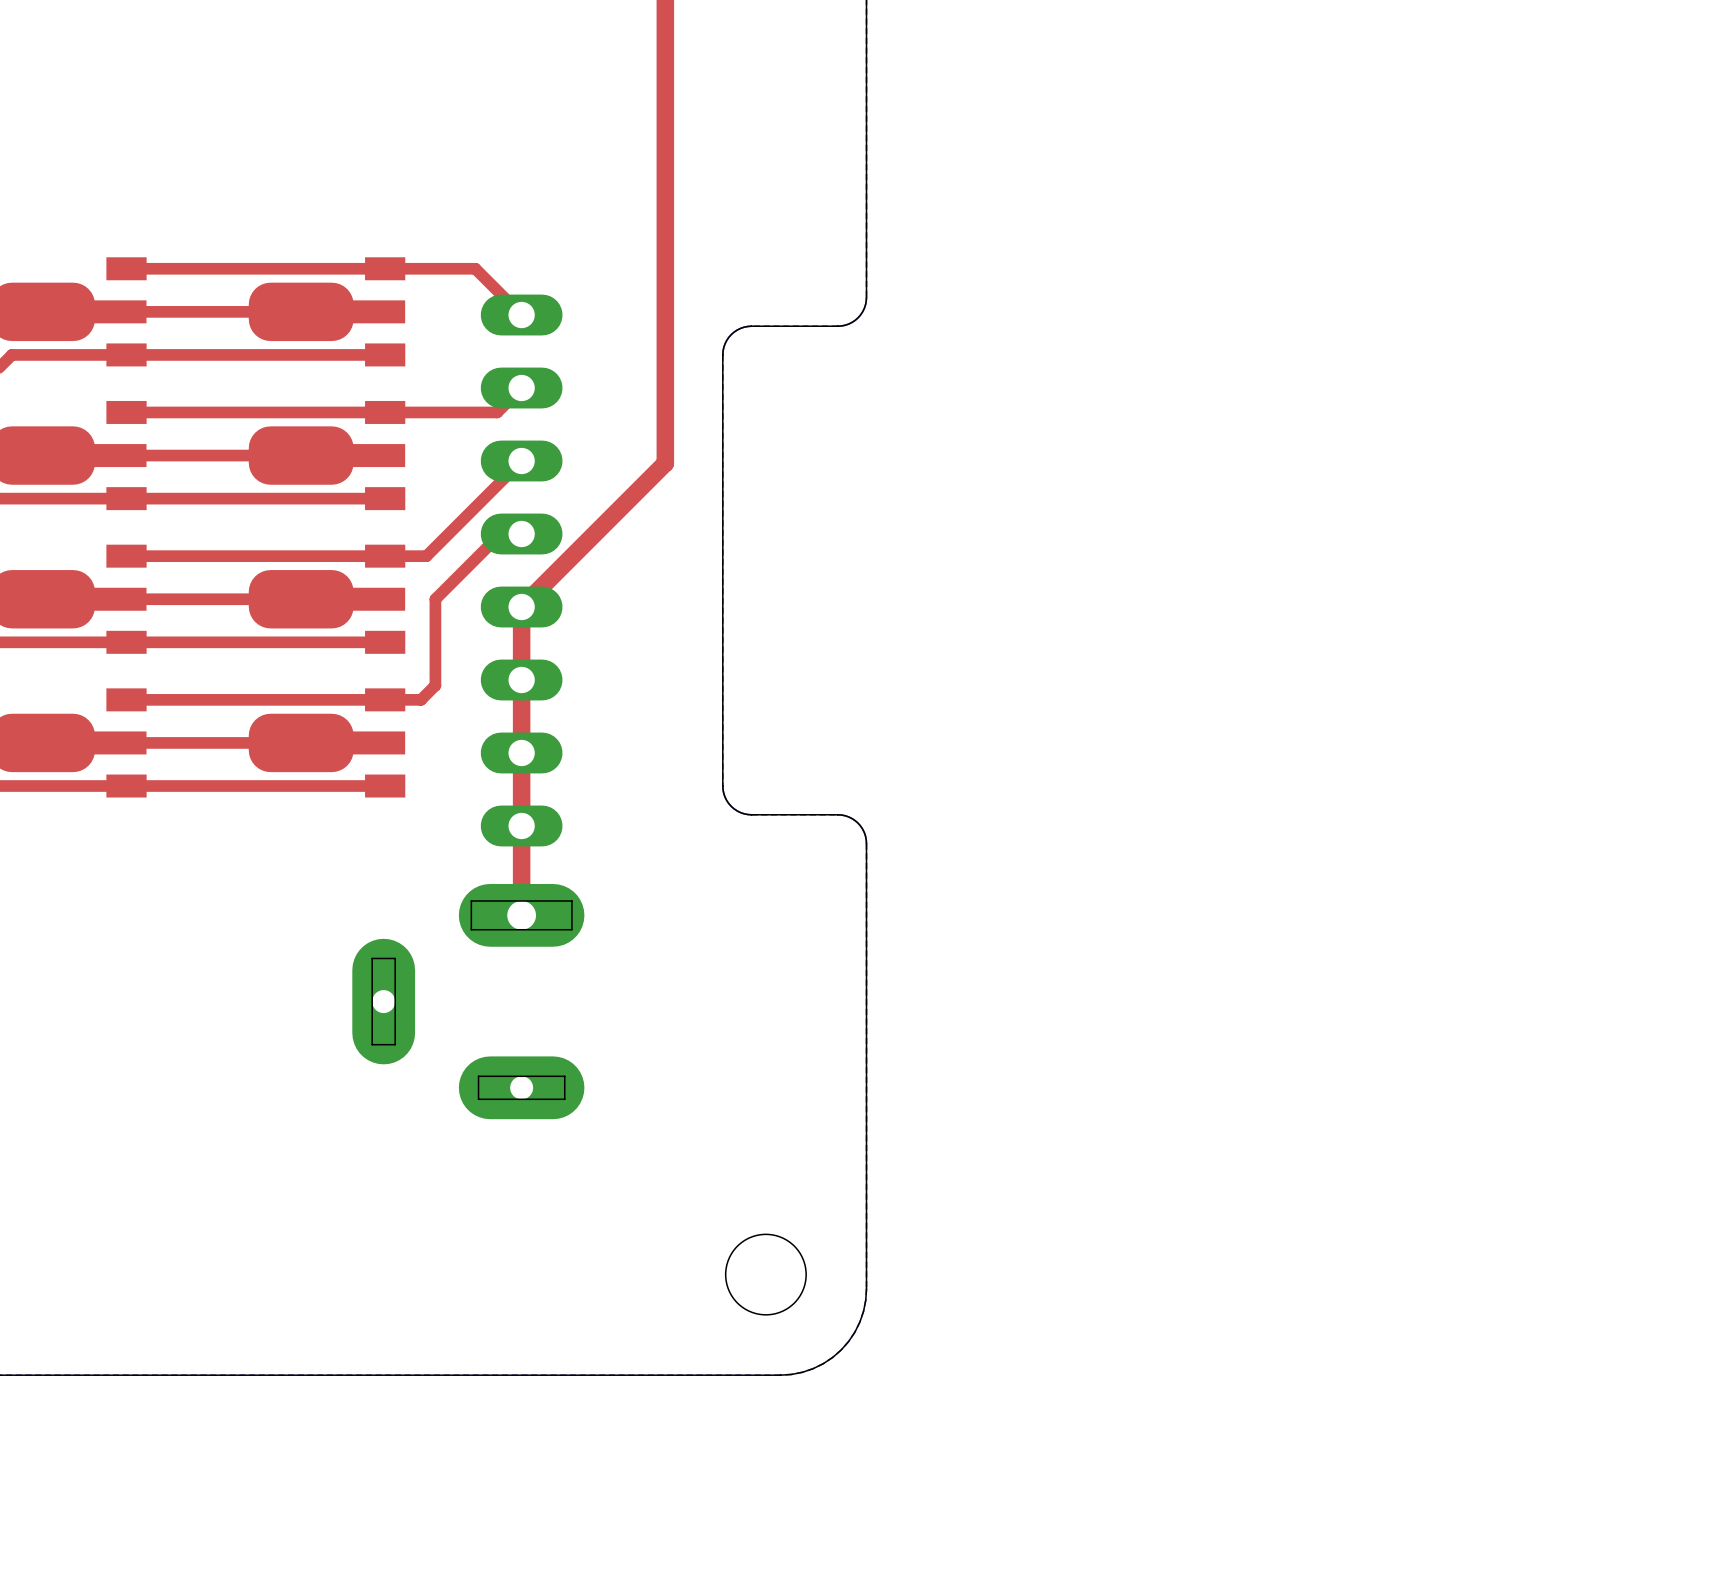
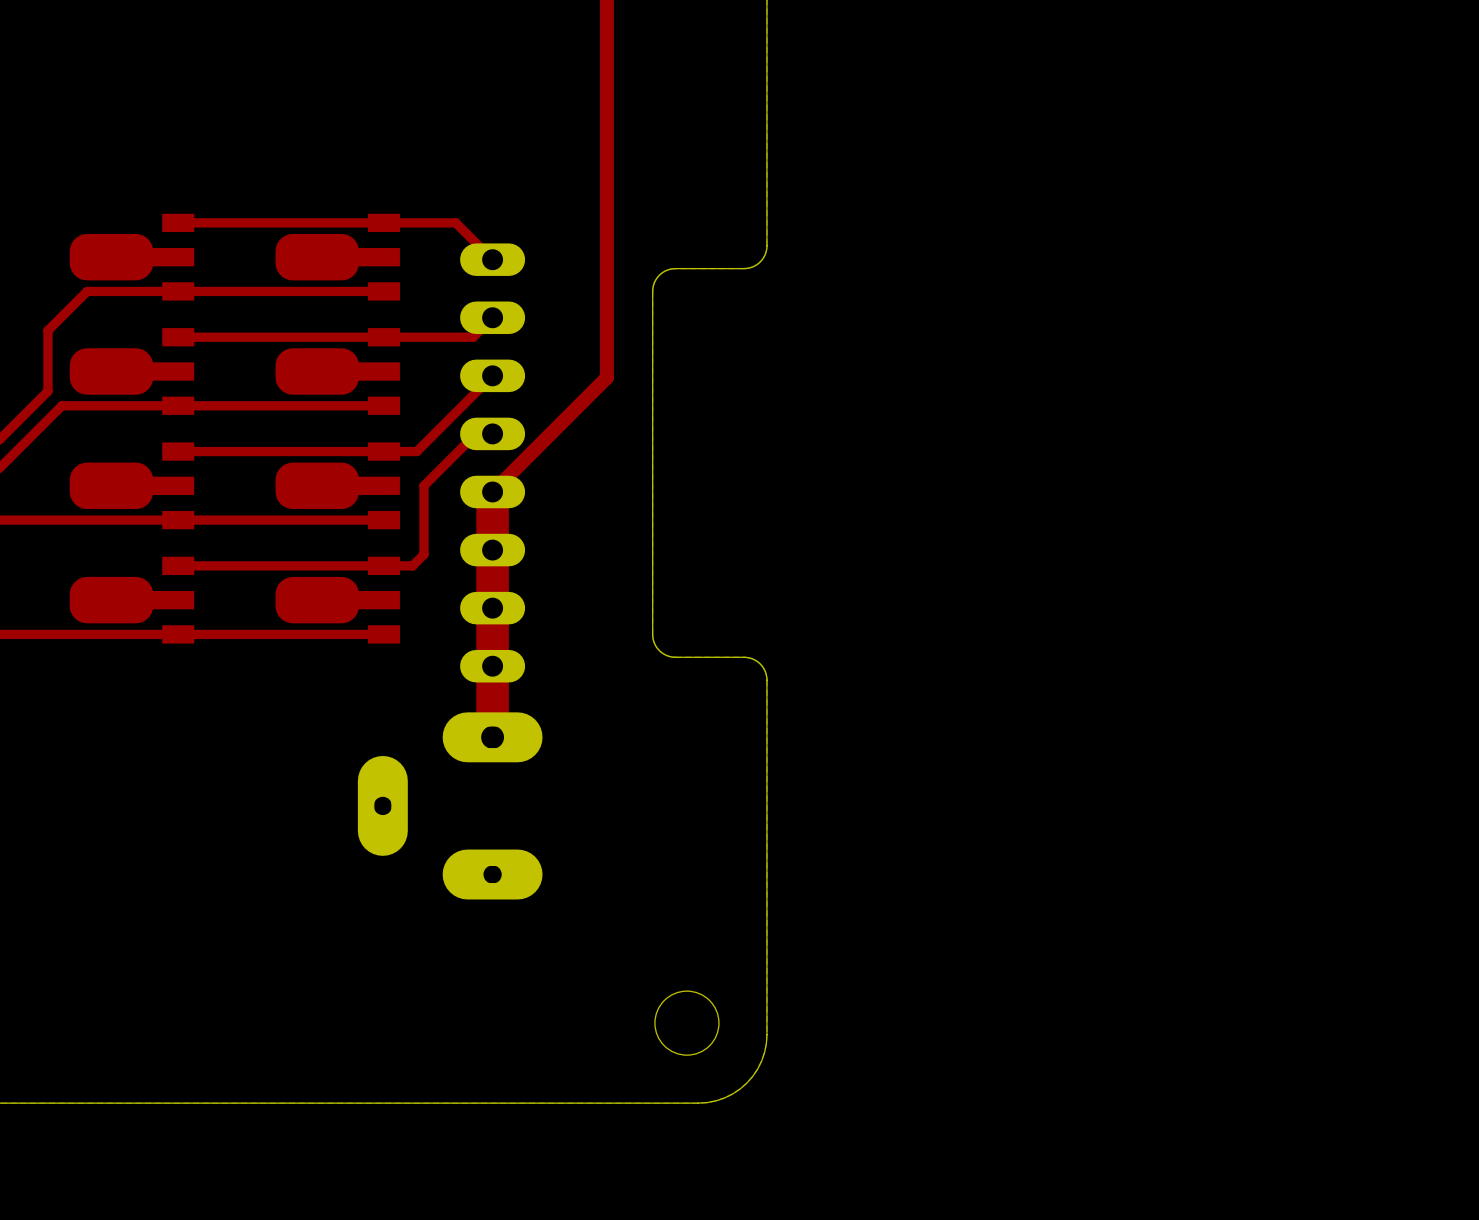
top track: (301, 311) (119, 311) -> none
top track: (301, 455) (119, 455) -> none
top track: (301, 599) (119, 599) -> none
top track width: thin (521, 607) (521, 915) -> thick (492, 491) (492, 737)
top track: (320, 742) (119, 742) -> none

